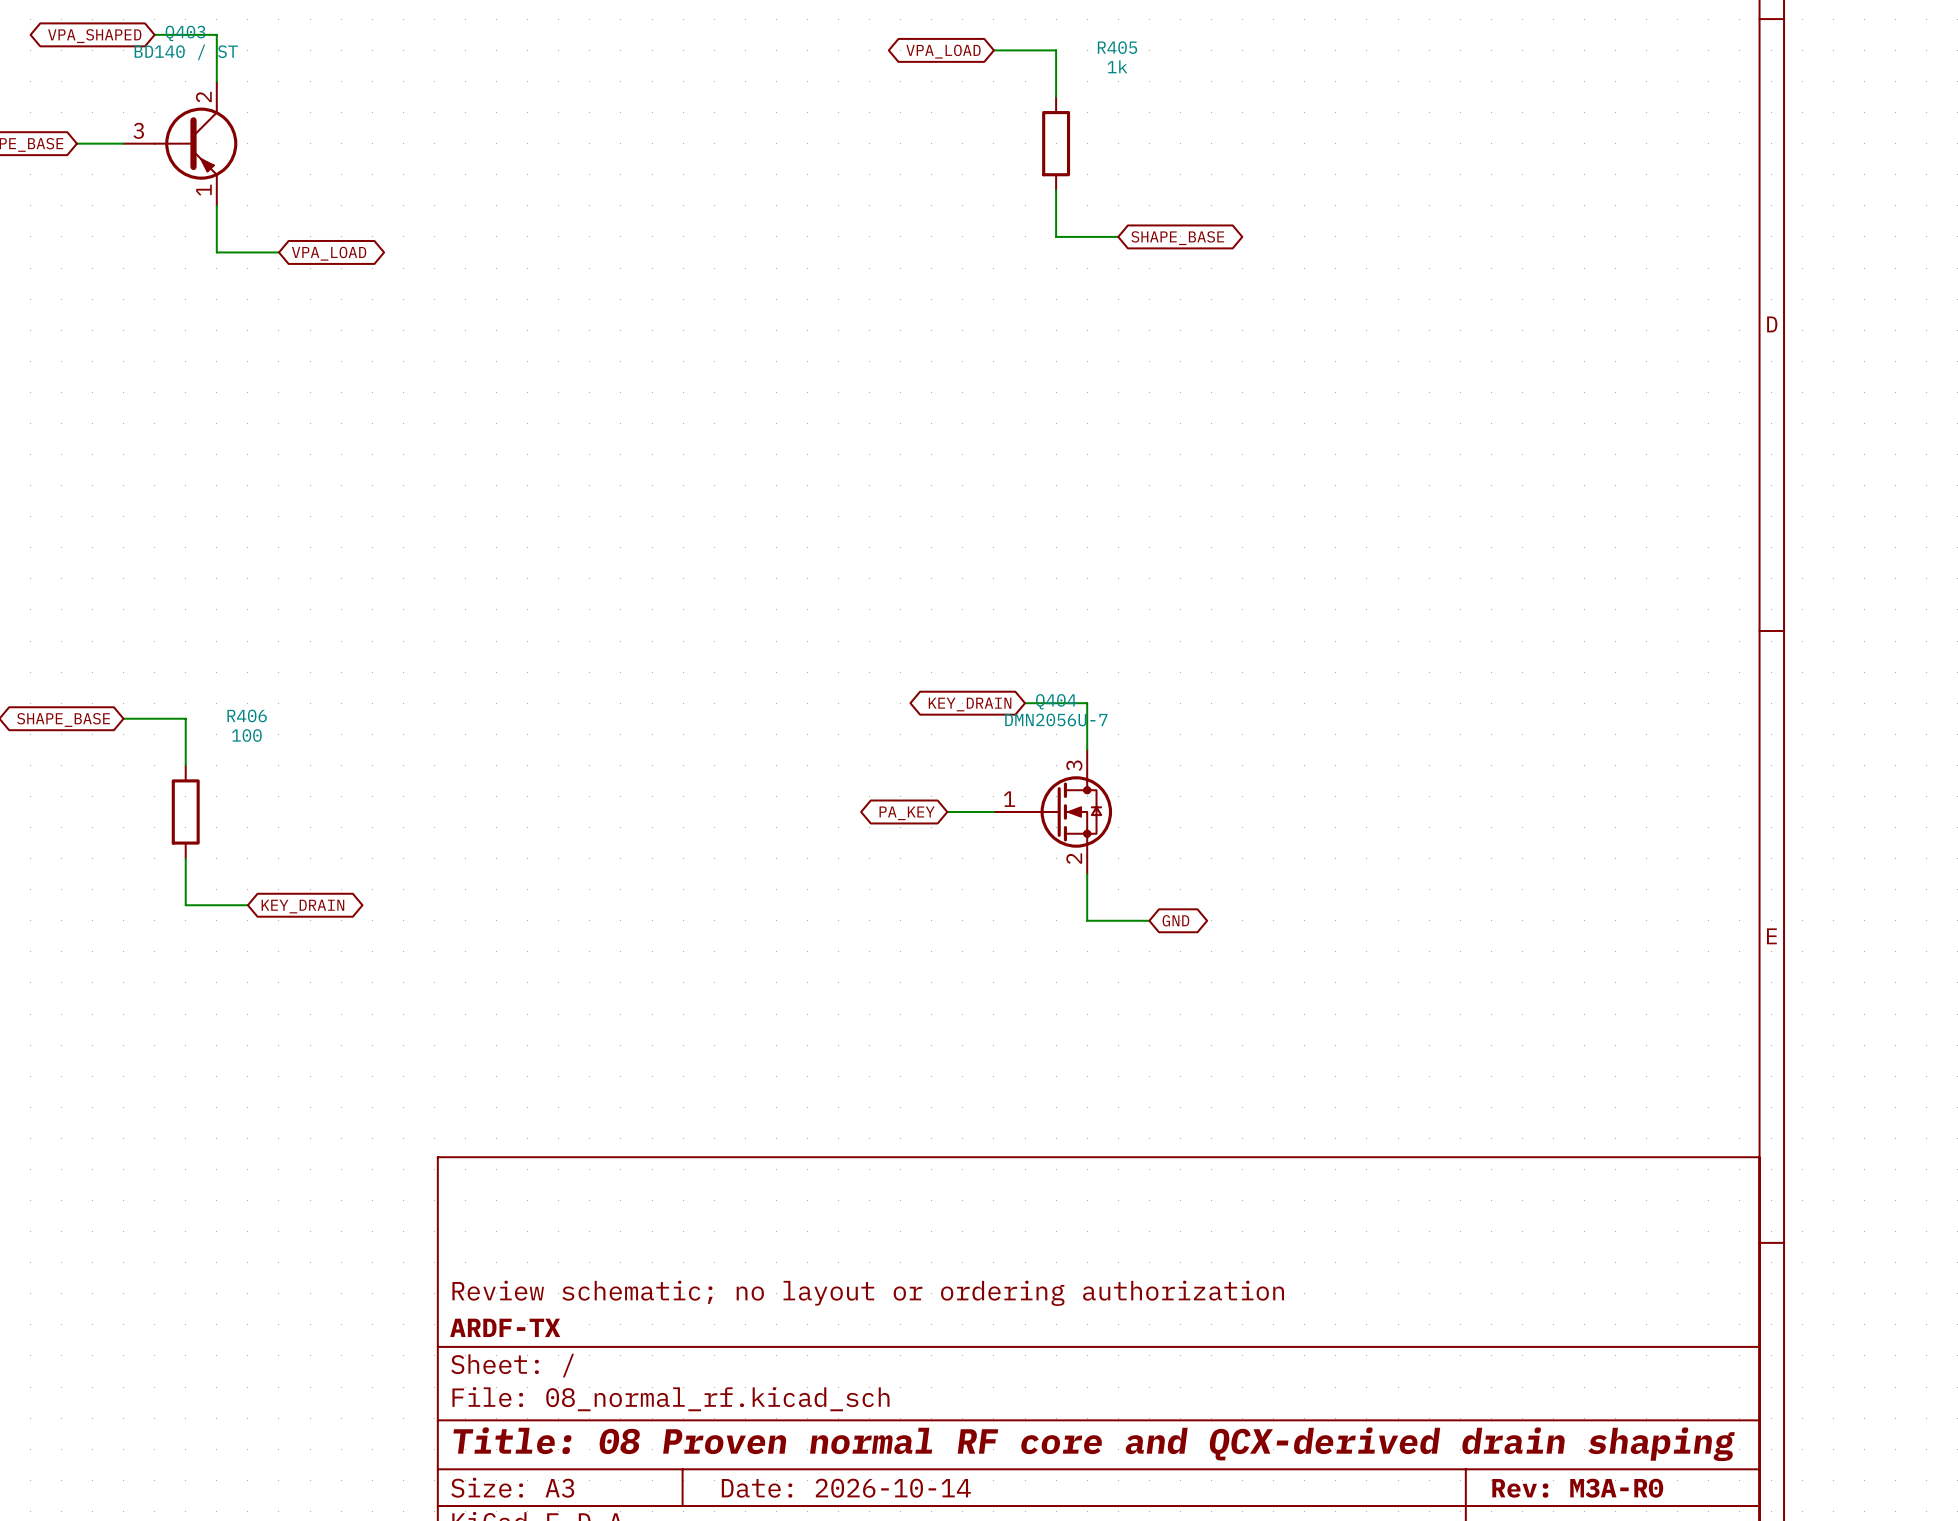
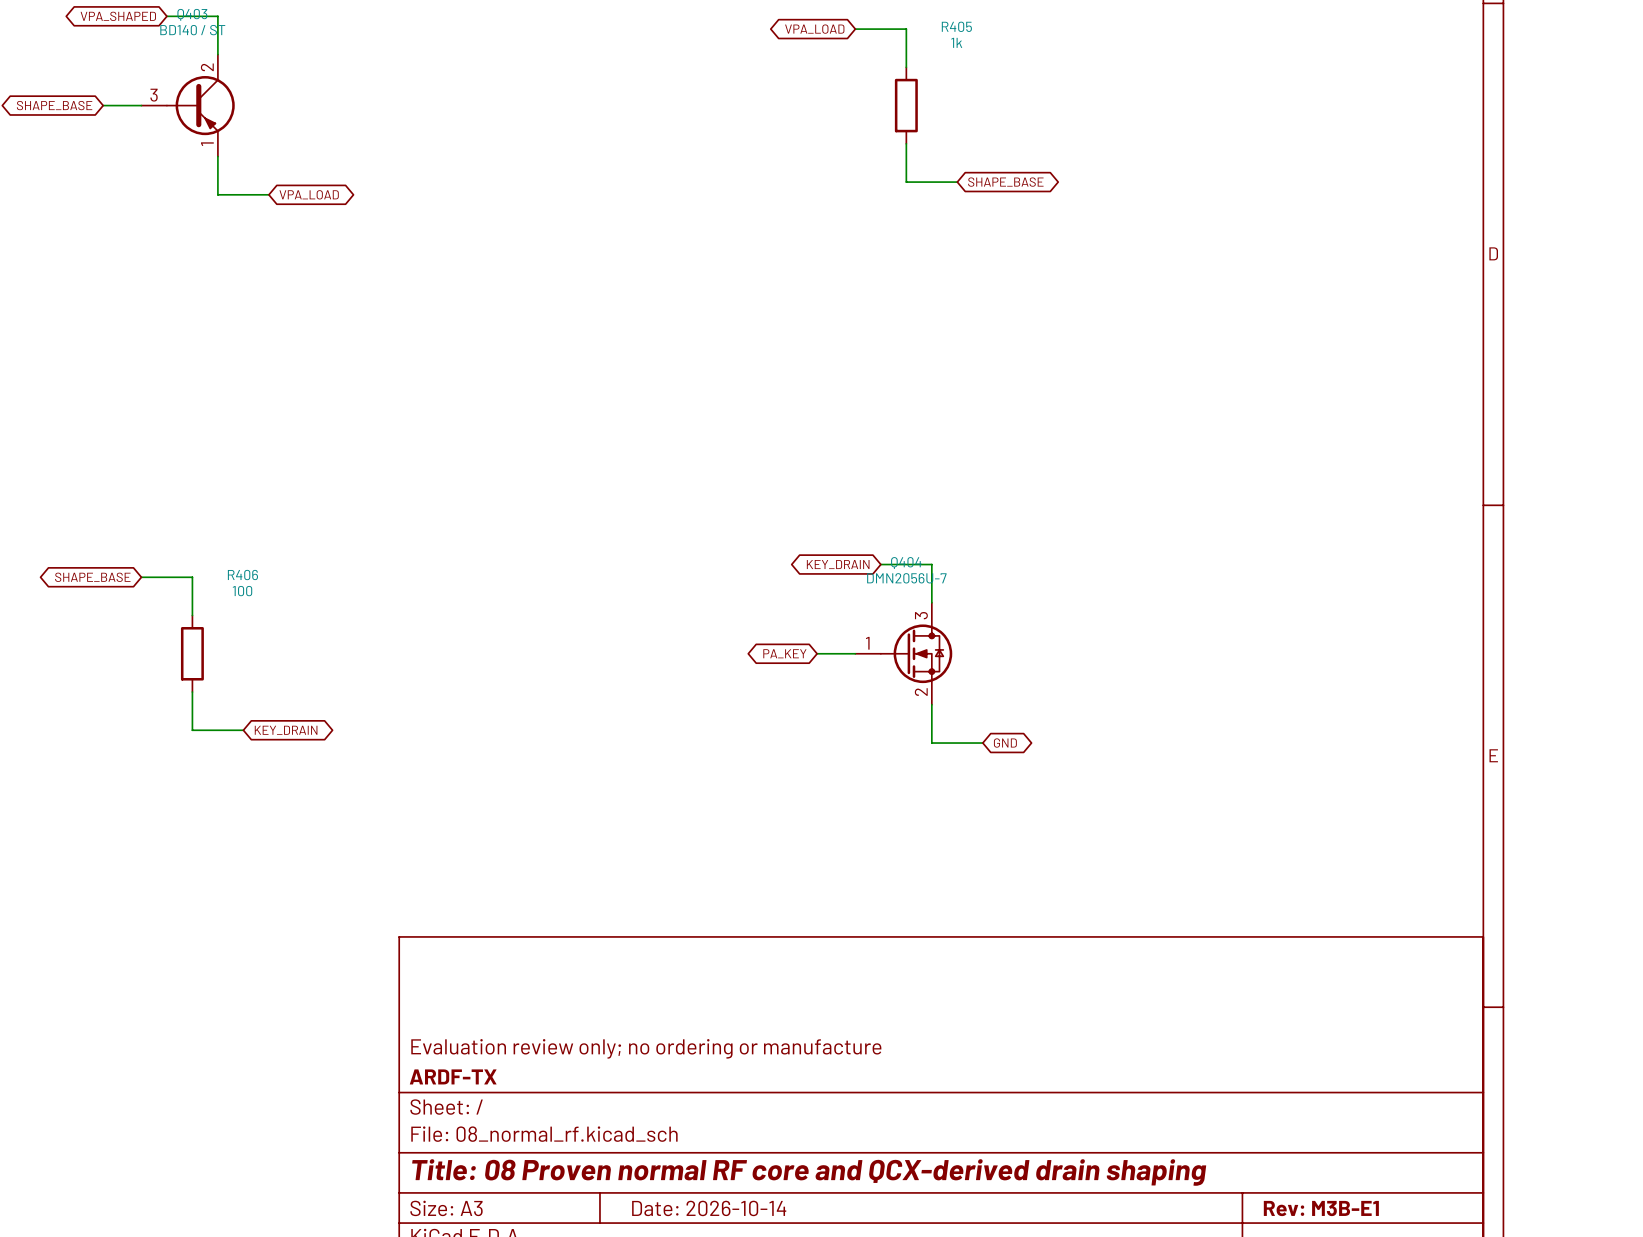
title block: Review schematic; no layout or ordering authorization (868, 1293) -> Evaluation review only; no ordering or manufacture (646, 1048)
title block: Rev: M3A-R0 (1577, 1488) -> Rev: M3B-E1 (1321, 1208)

